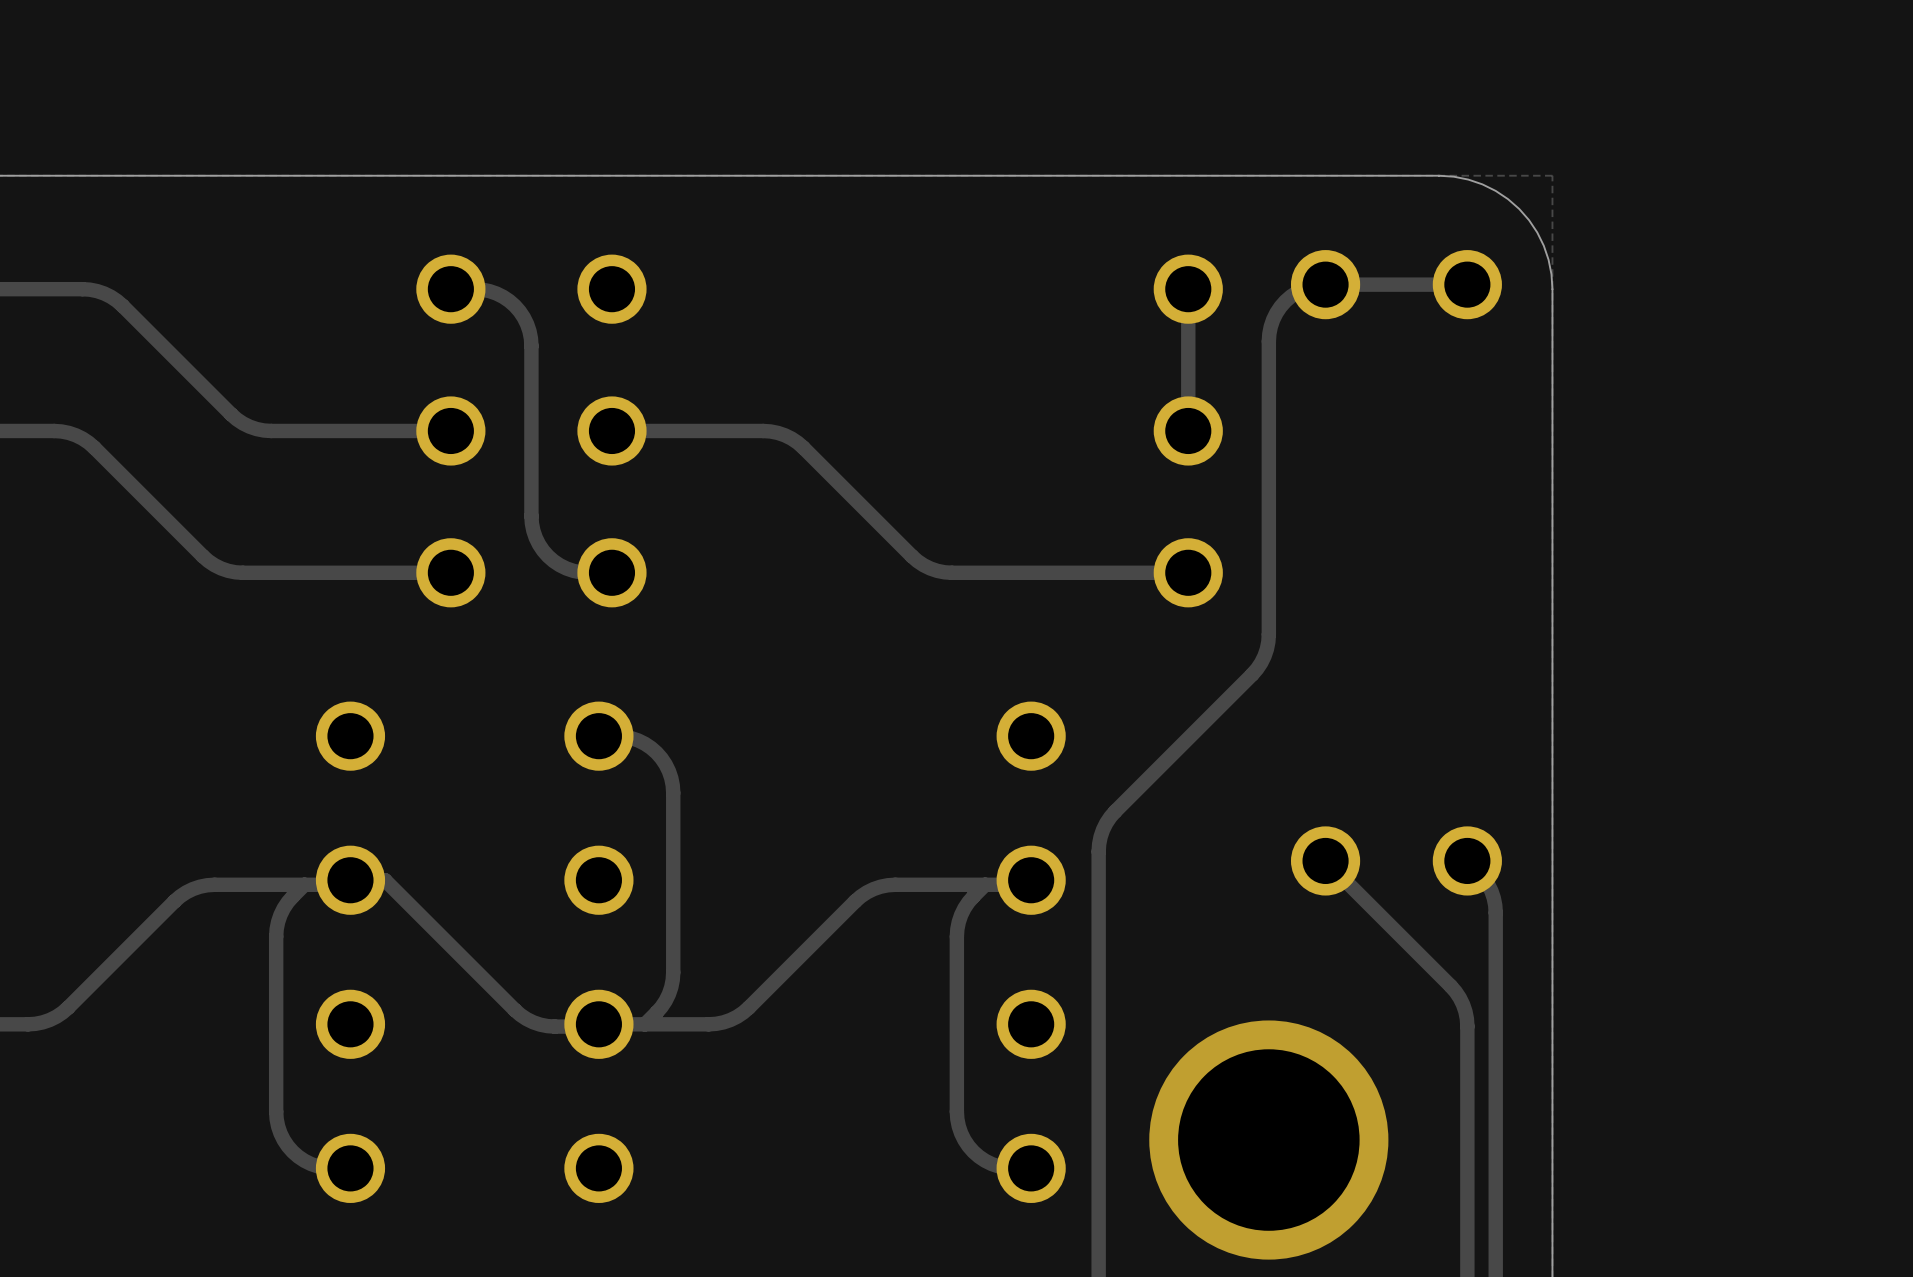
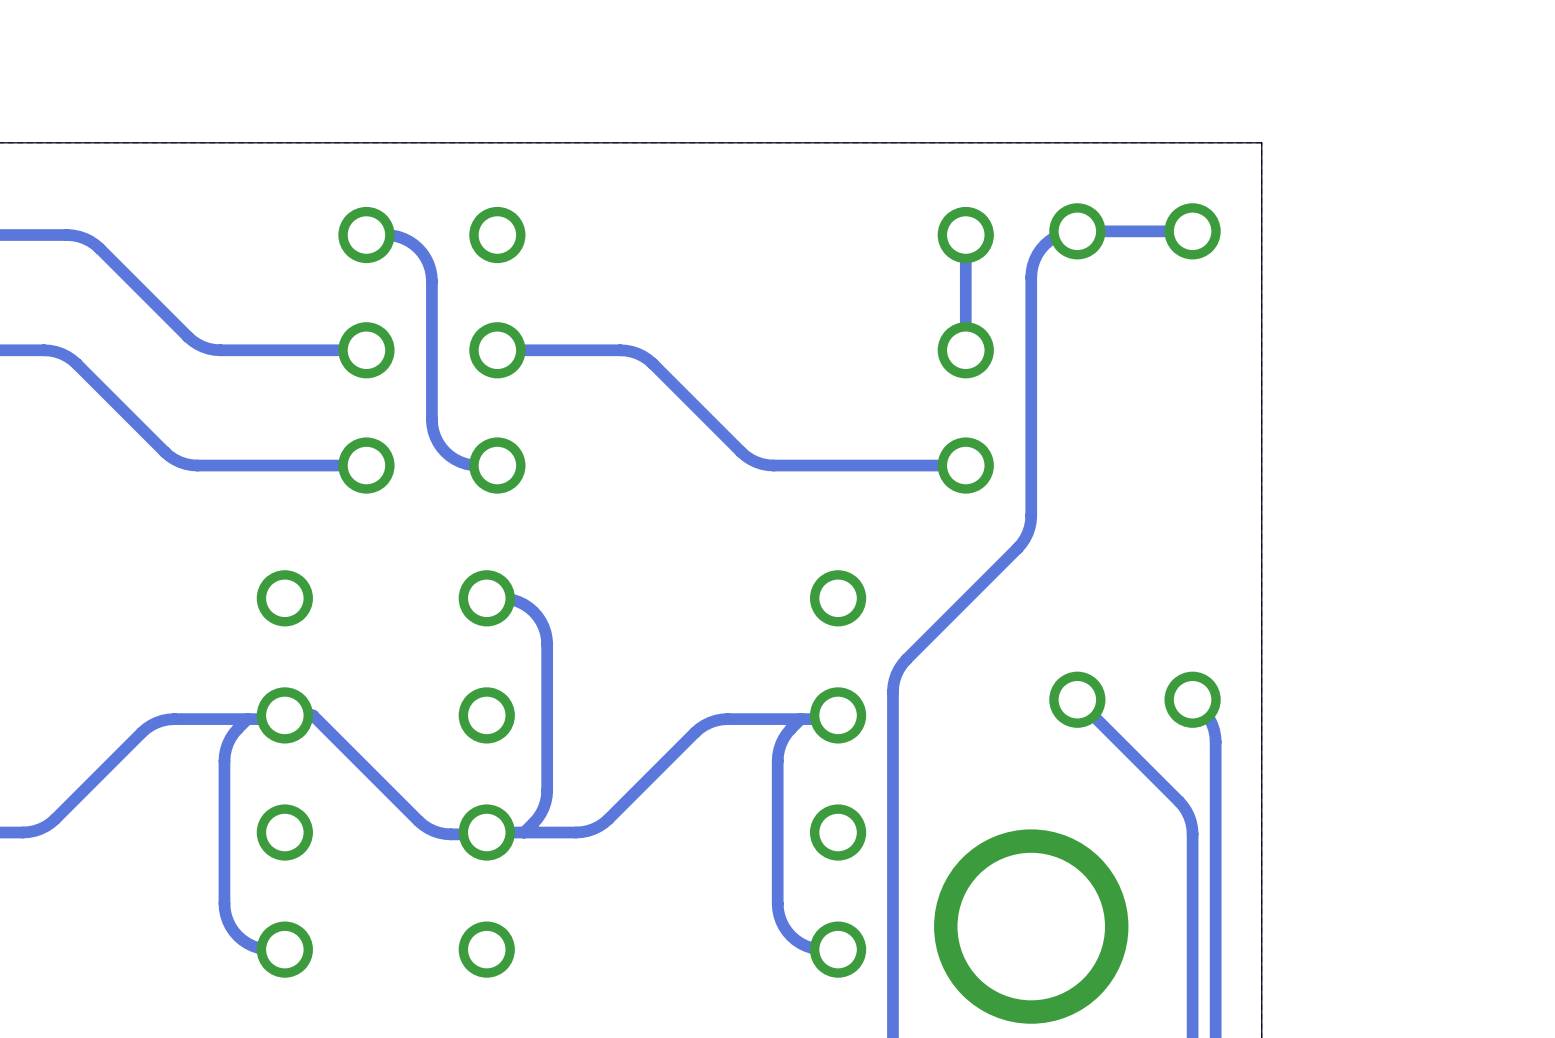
board edge: (1439, 175) (1468, 179) (1482, 184) (1495, 190) (1519, 208) (1537, 232) (1543, 245) (1548, 259) (1552, 289) -> (1169, 142) (1261, 142) (1261, 235)

